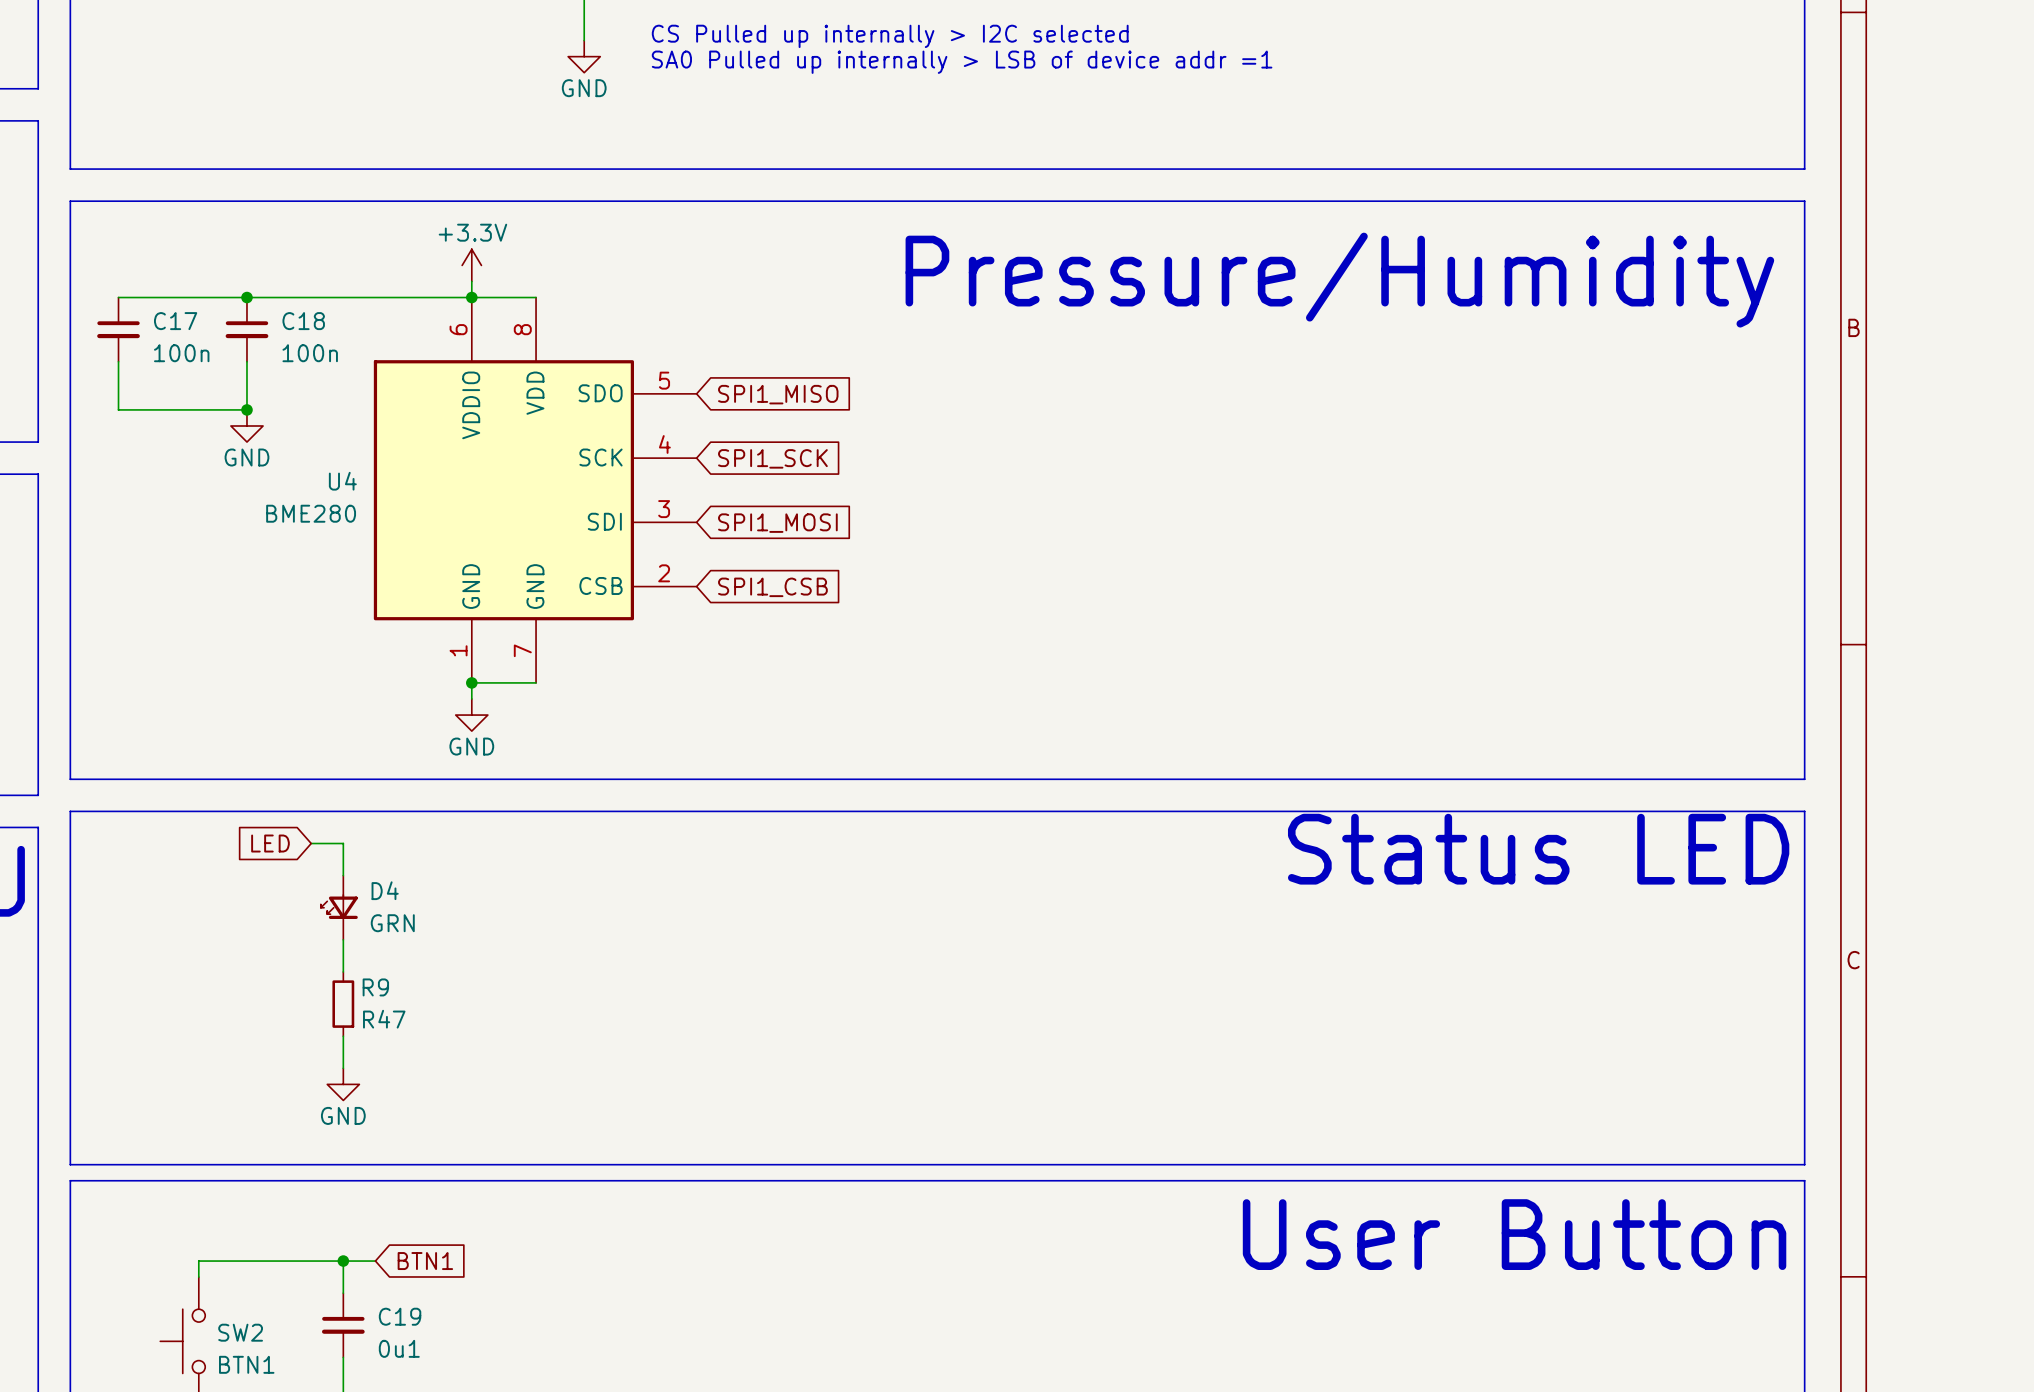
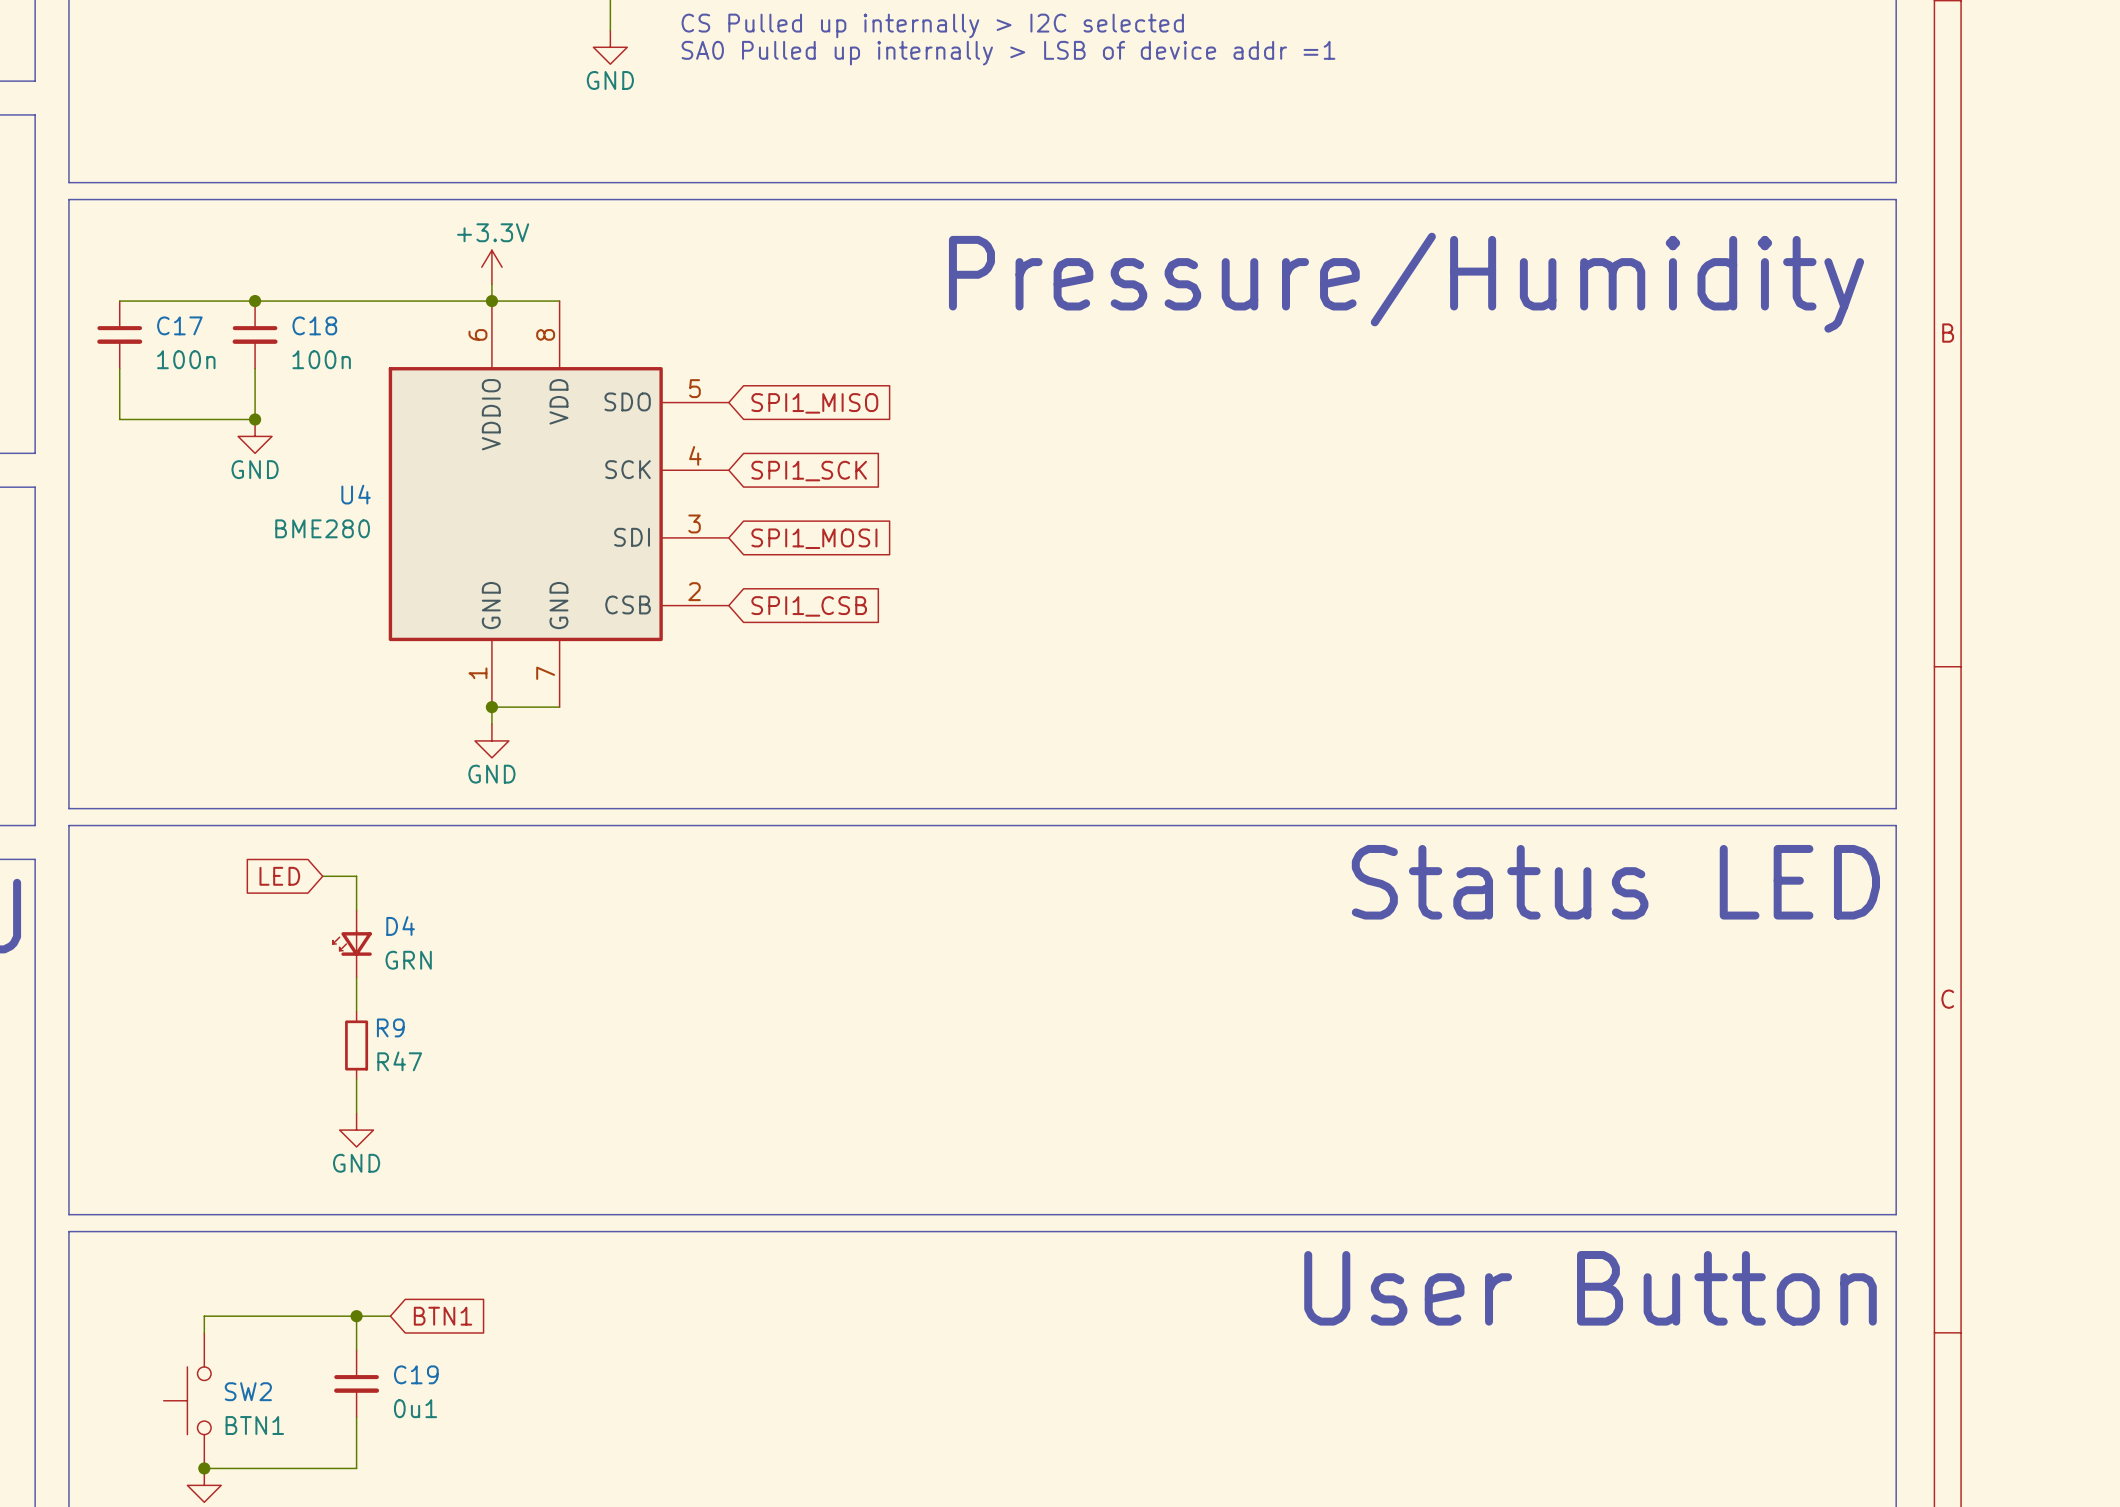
line: (70, 169) (1804, 169) -> (68, 165) (68, 182) (1896, 182) (1896, 165)
line: (70, 811) (1804, 811) -> (68, 842) (68, 825) (1896, 825) (1896, 842)

